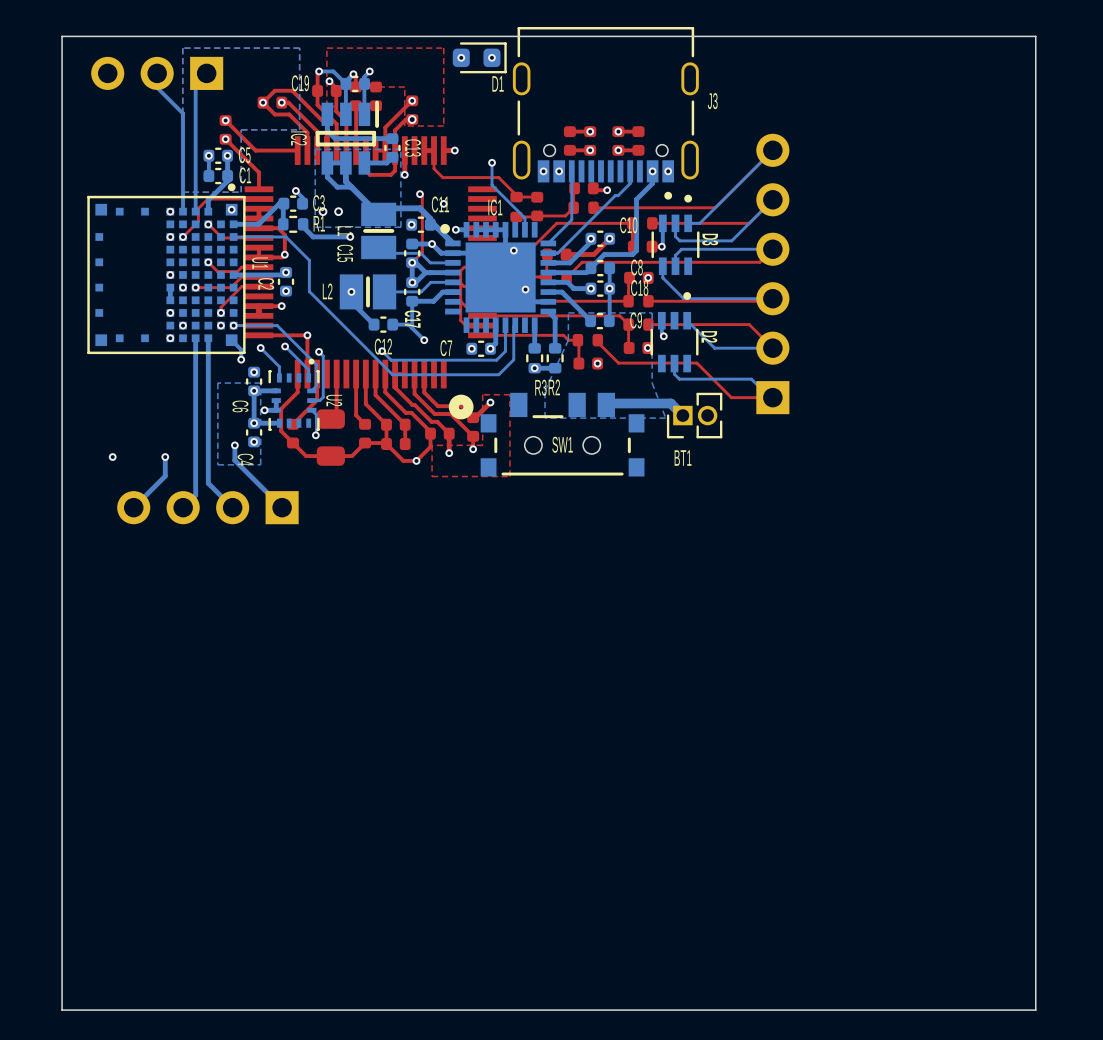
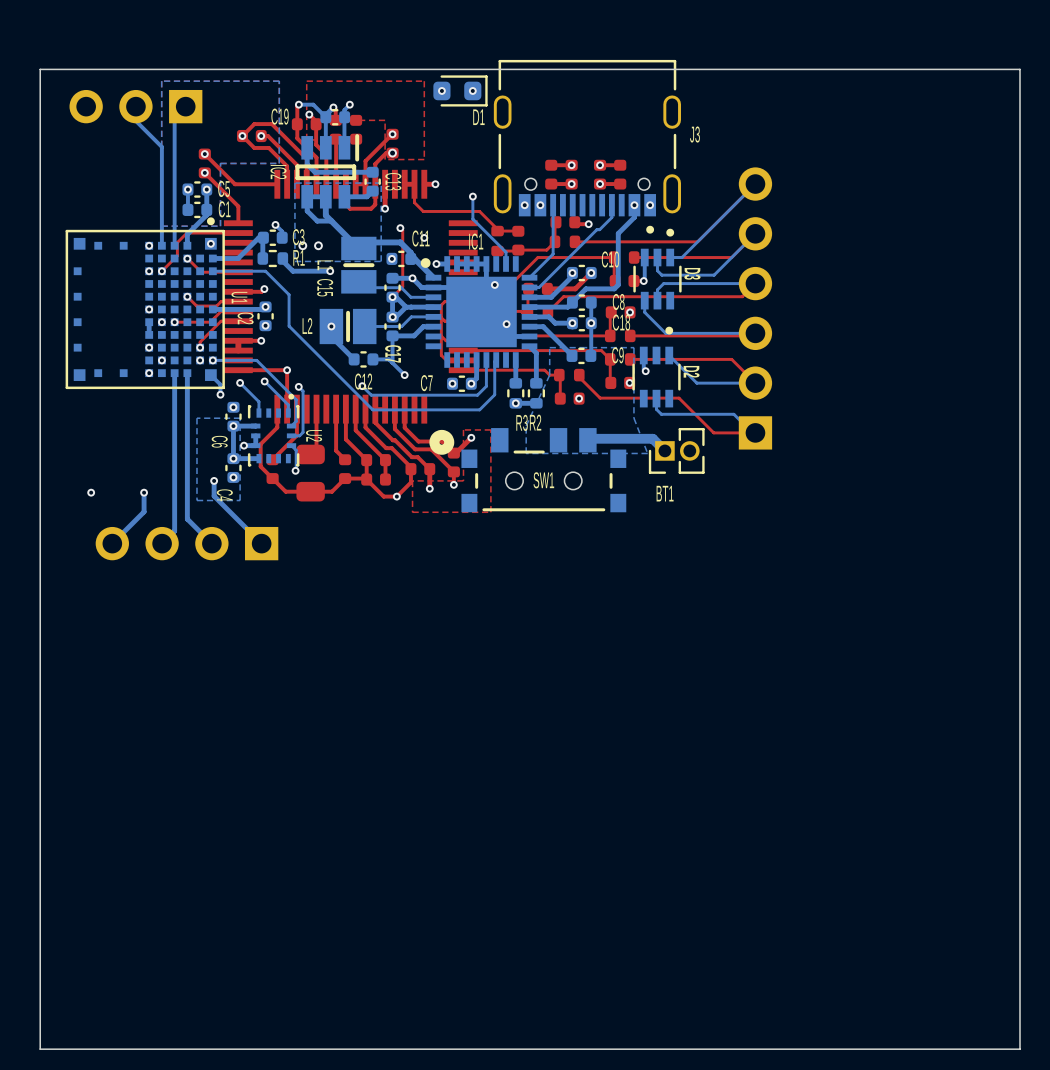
top track: (258, 208) (258, 228) (278, 228) (284, 234) (284, 254) -> none
top track: (258, 247) (258, 257) -> none

